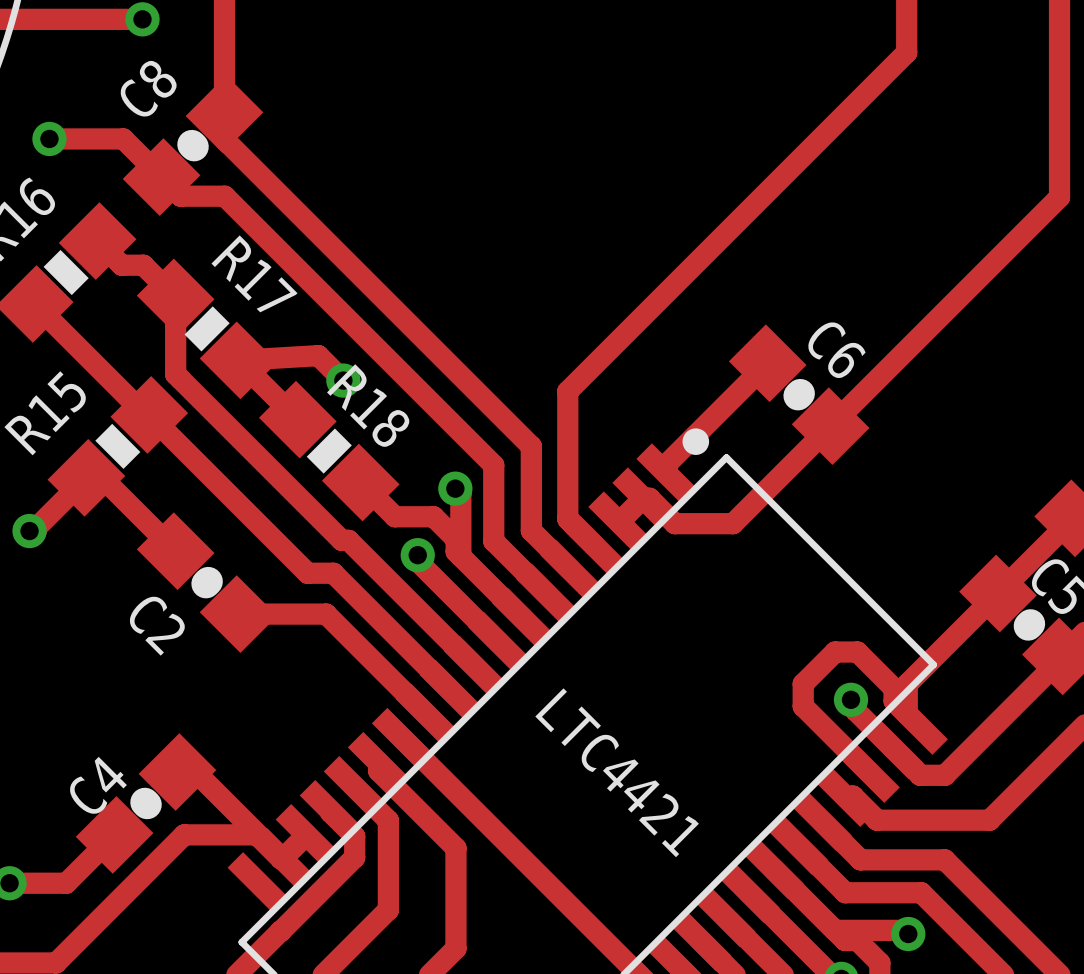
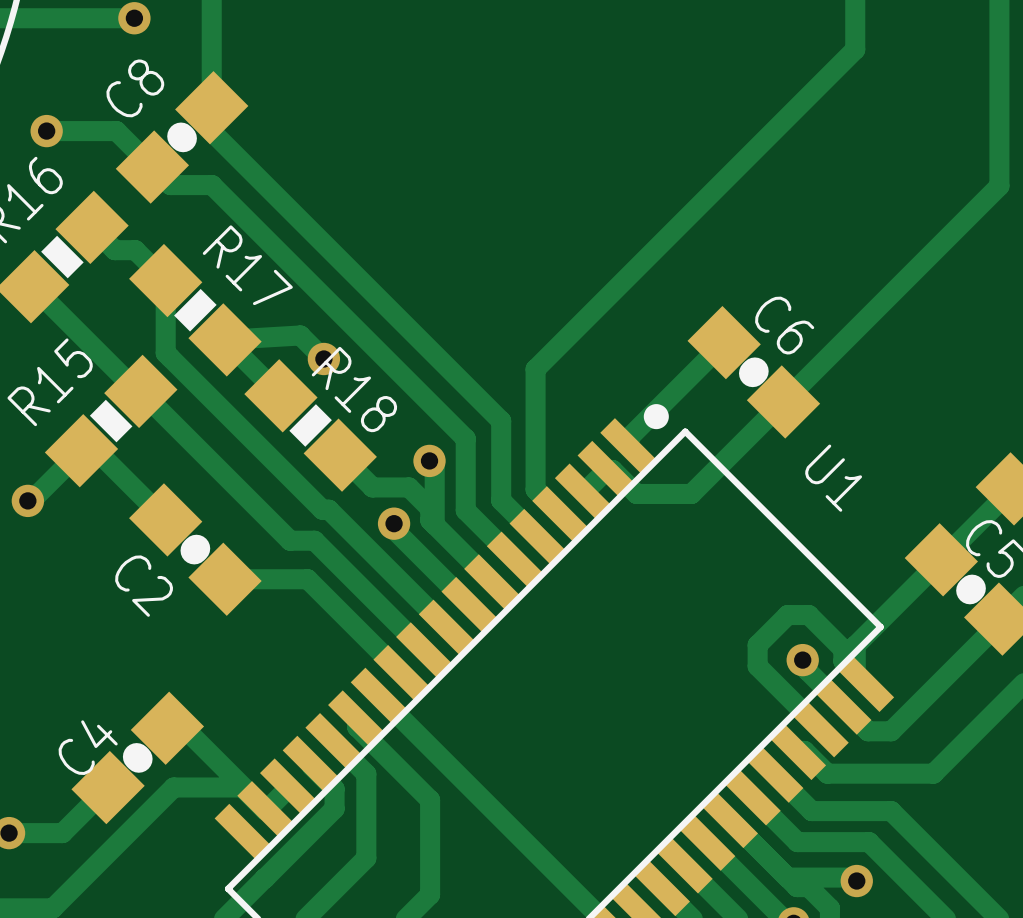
LTC4421 name: LTC4421 (617, 772) -> U1 (833, 478)

